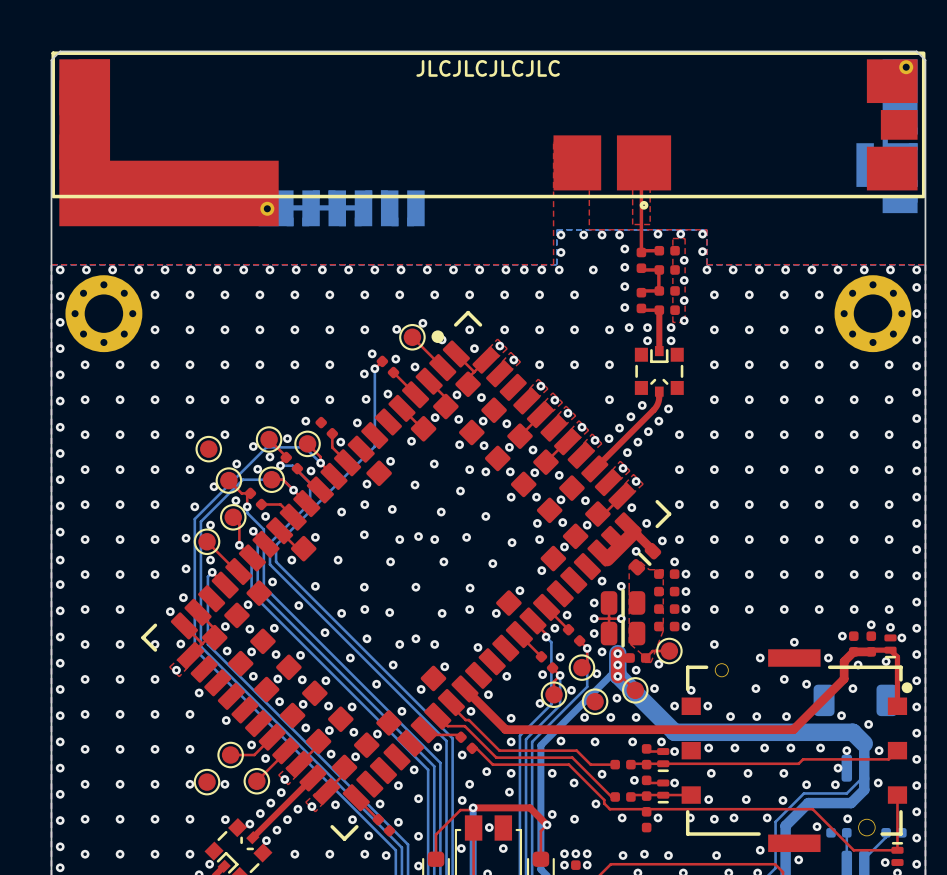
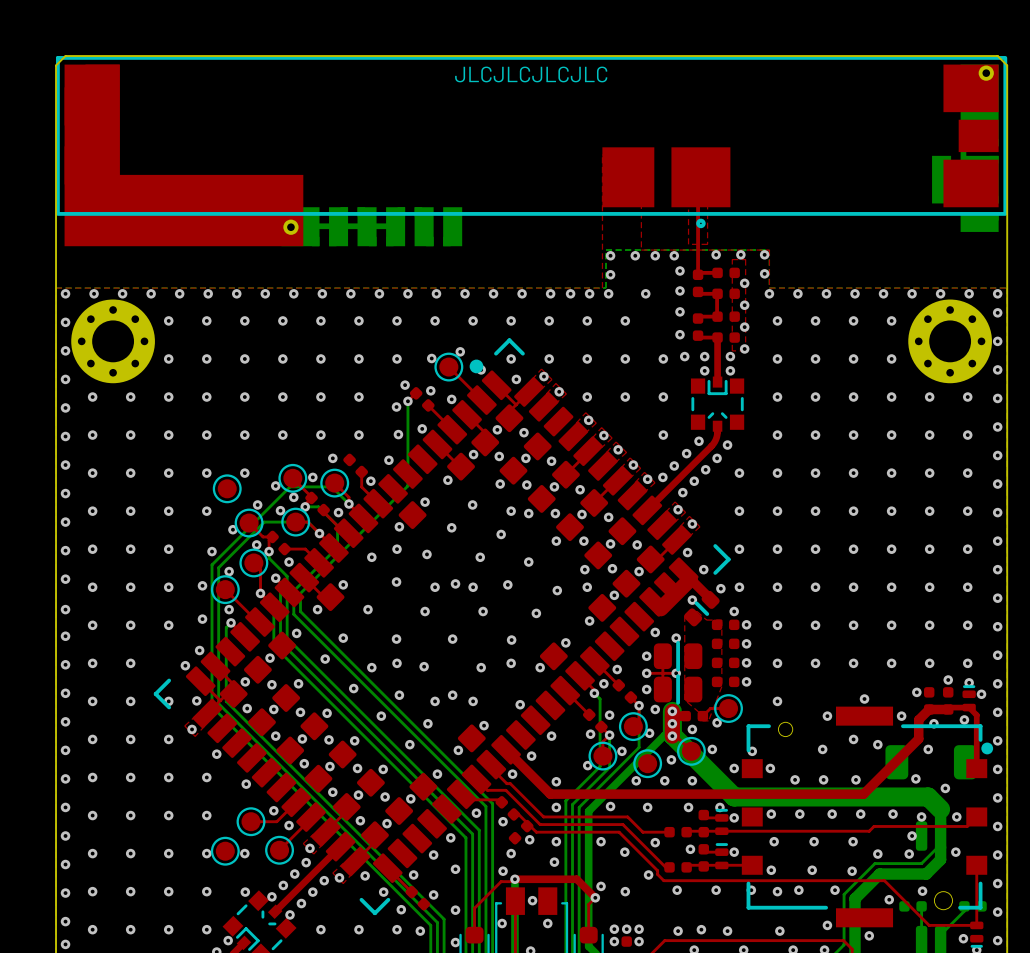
part rotation: 0° (890, 646) -> 180° (969, 698)
part rotation: 0° (663, 760) -> 180° (721, 821)
part: none -> (521, 832)
part rotation: 0° (663, 791) -> 180° (721, 856)
part: (646, 819) -> none
part rotation: 0° (897, 853) -> 180° (976, 934)

